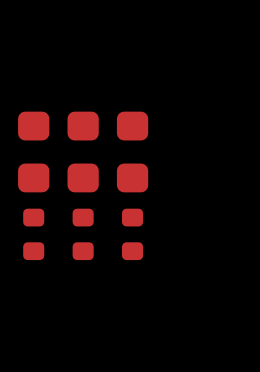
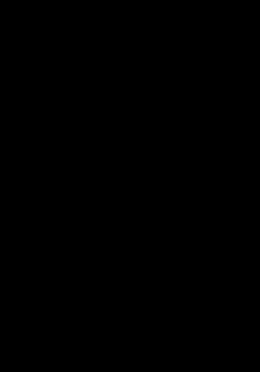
part: (33, 152) -> none
part: (83, 152) -> none
part: (132, 152) -> none
part: (33, 234) -> none
part: (83, 234) -> none
part: (132, 234) -> none

